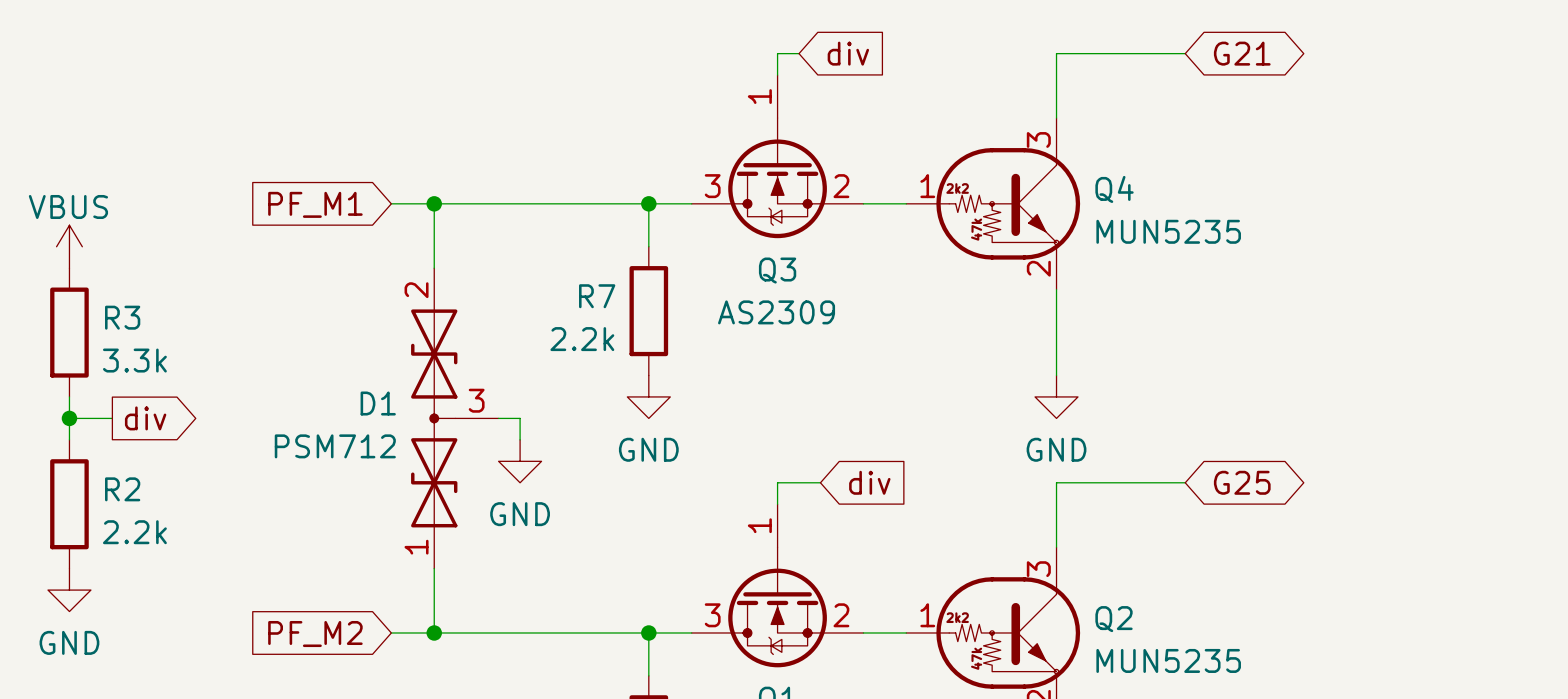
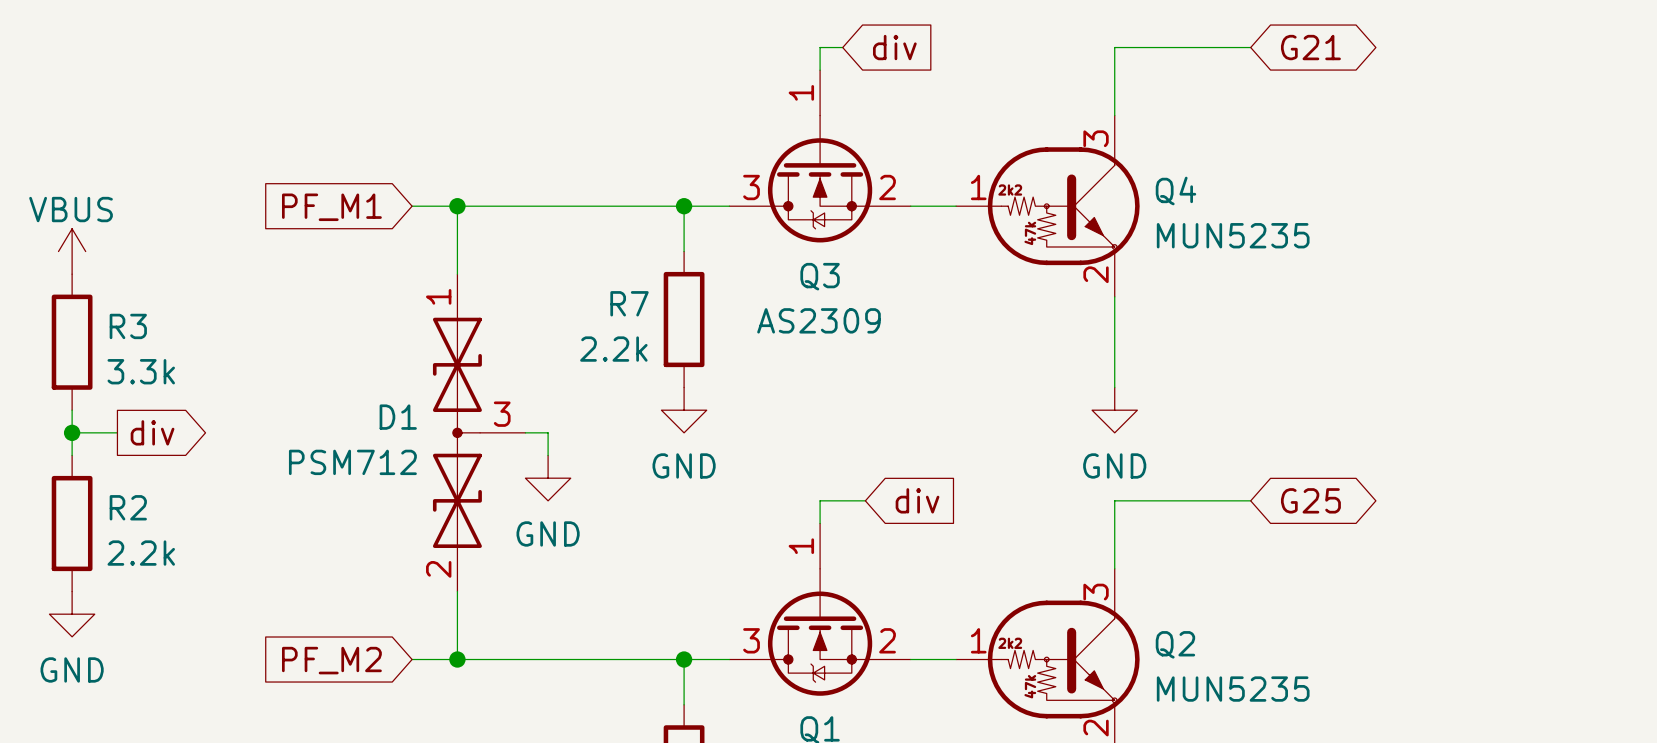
D1 flip: as is (434, 418) -> up-down (457, 432)

